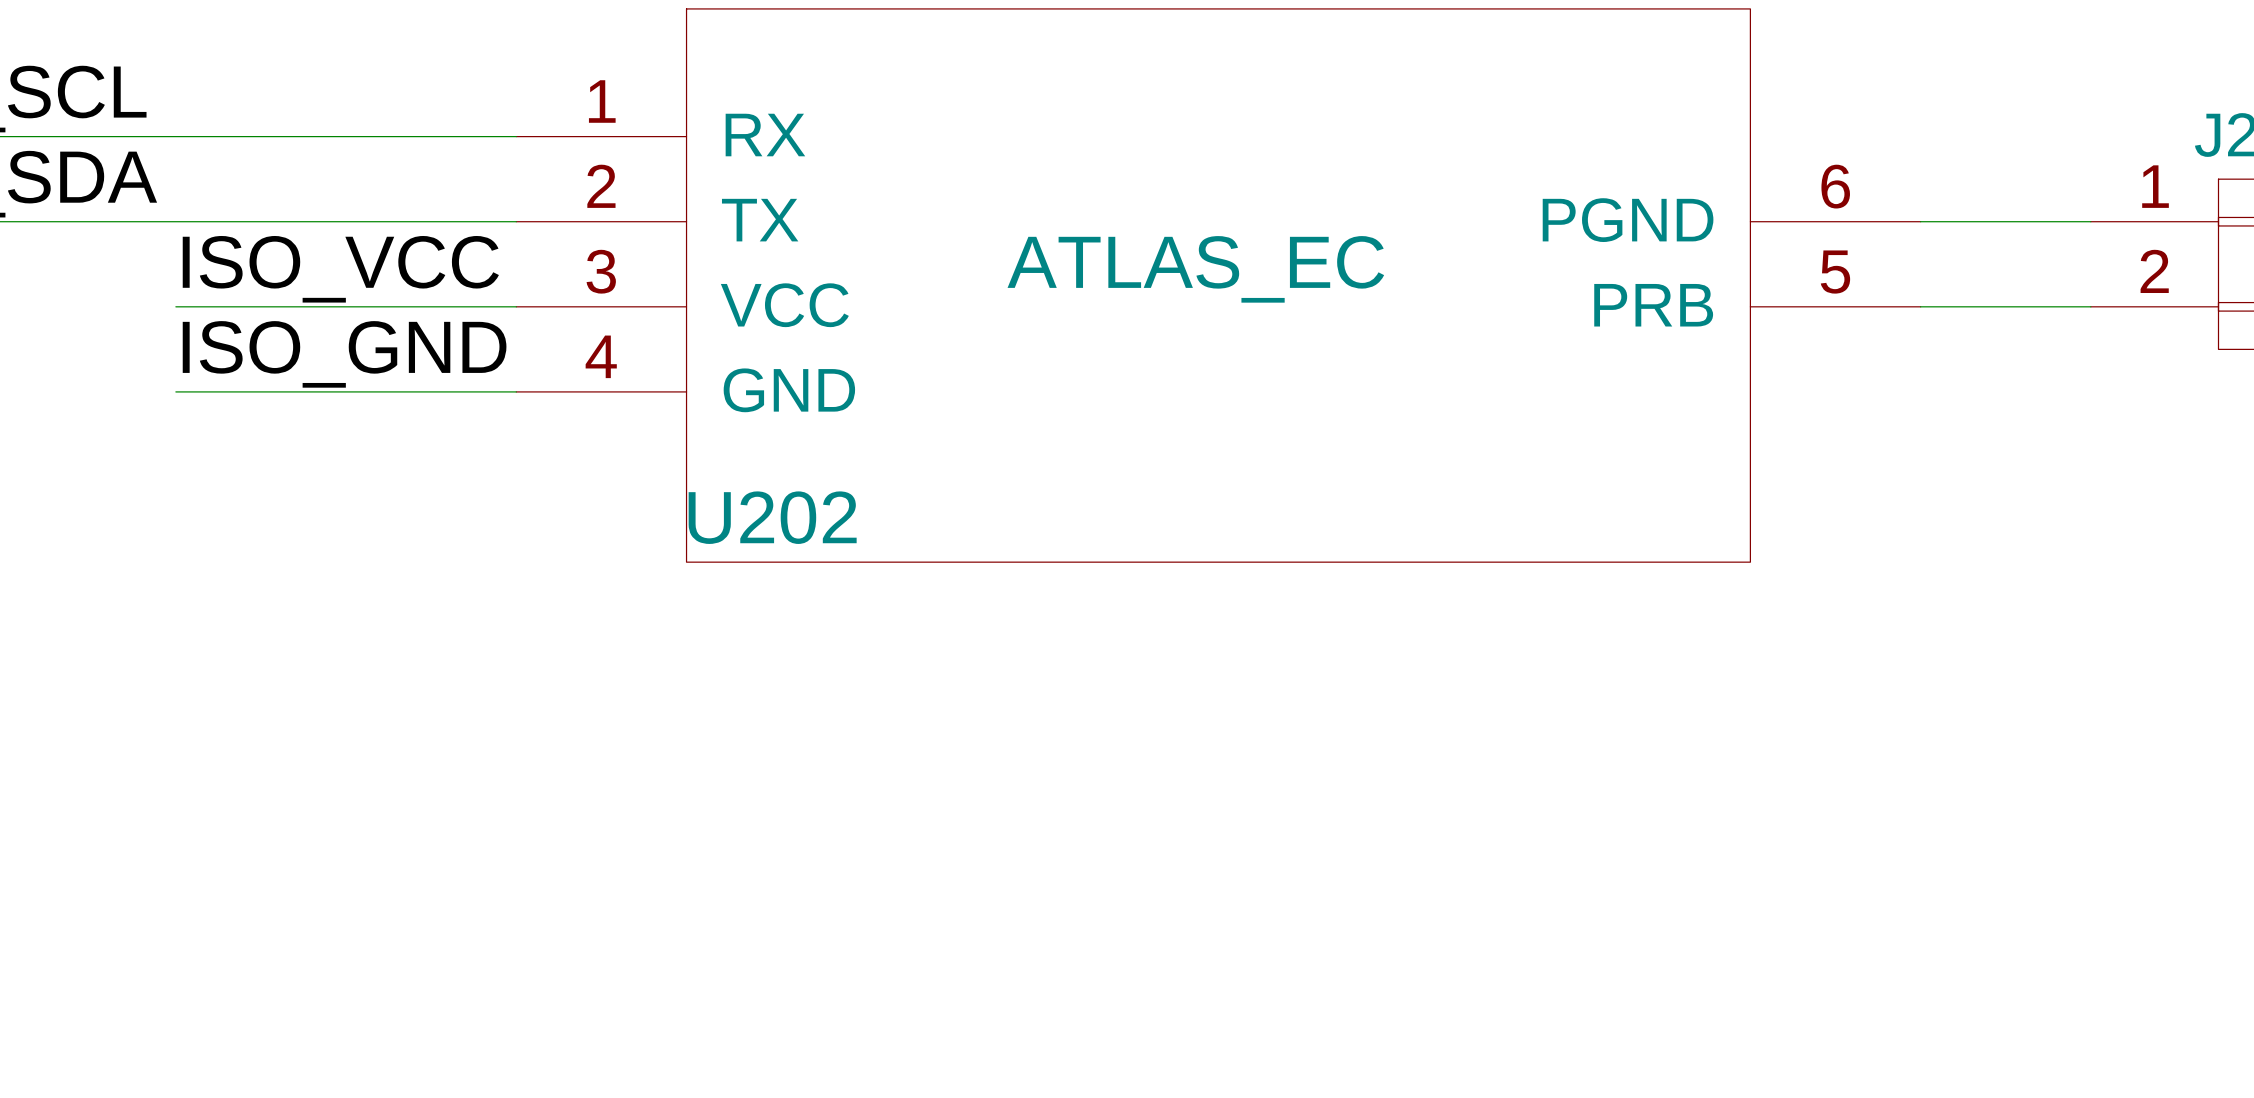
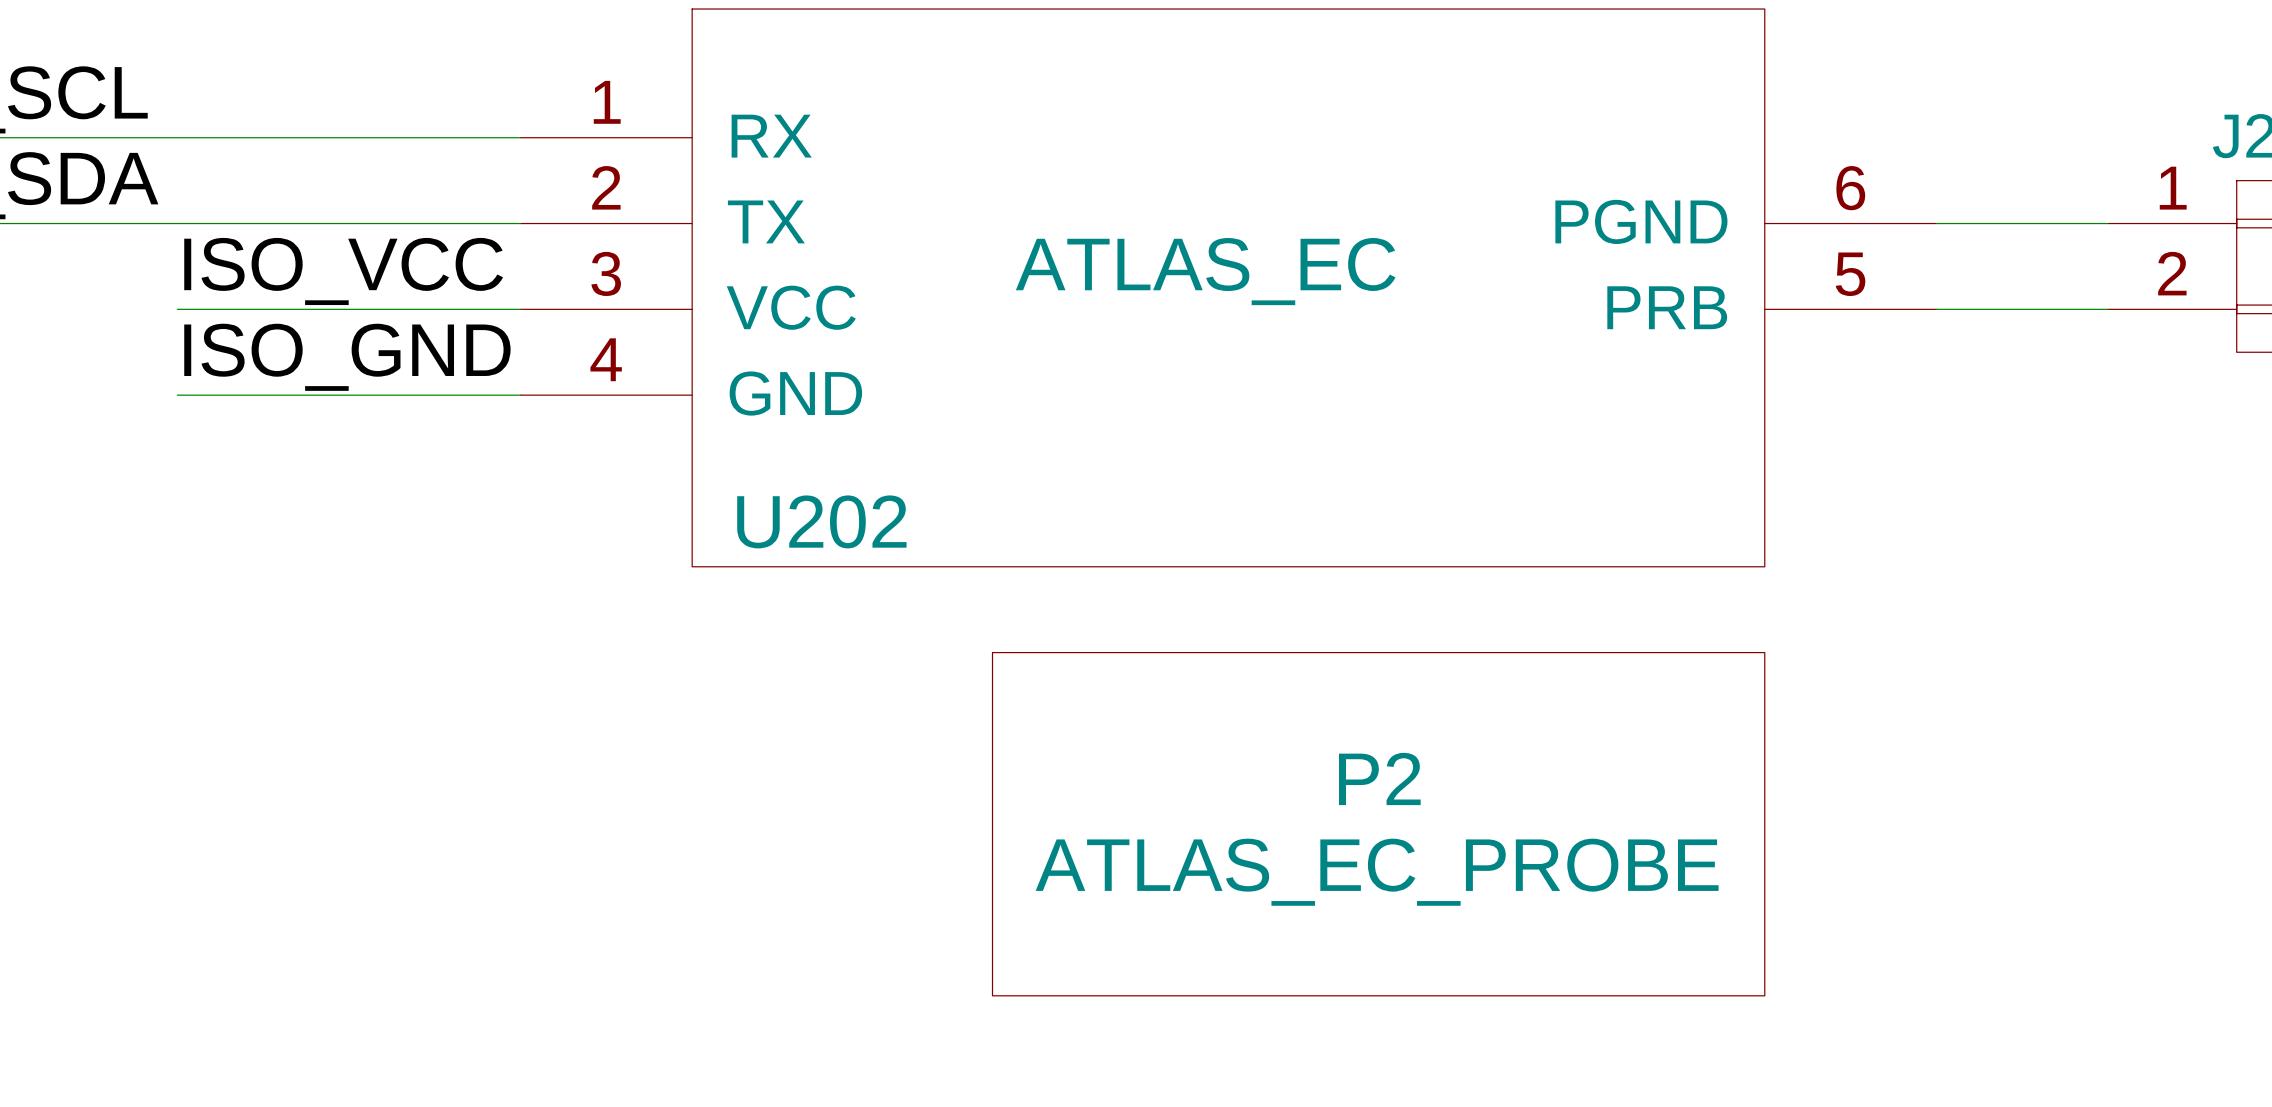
U202 name position: U202 (772, 517) -> U202 (821, 521)
P2: none -> ATLAS_EC_PROBE (1378, 824)

